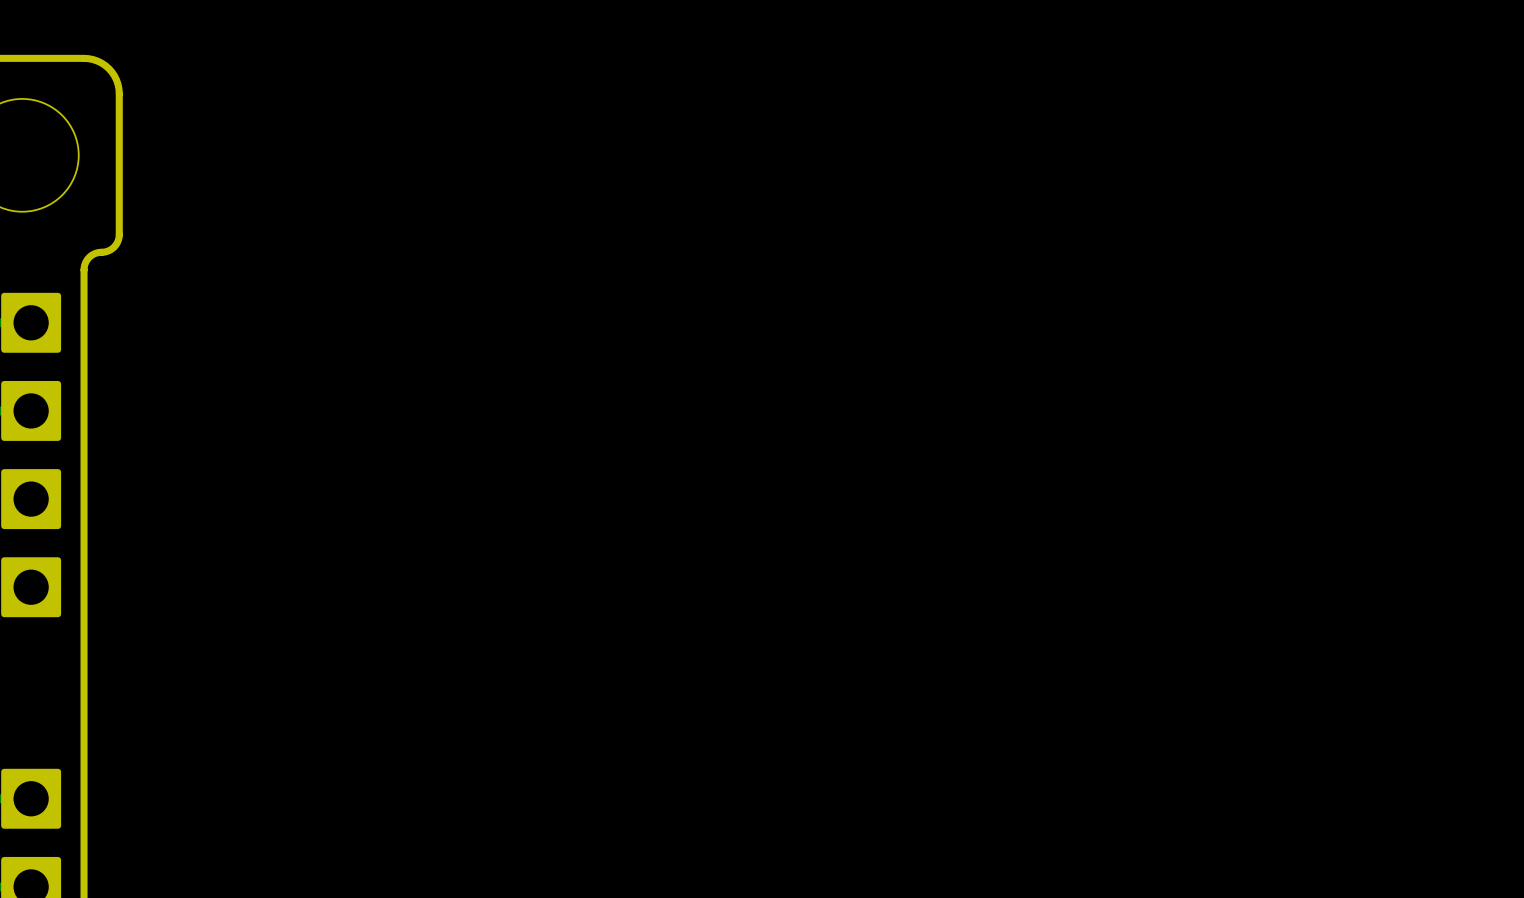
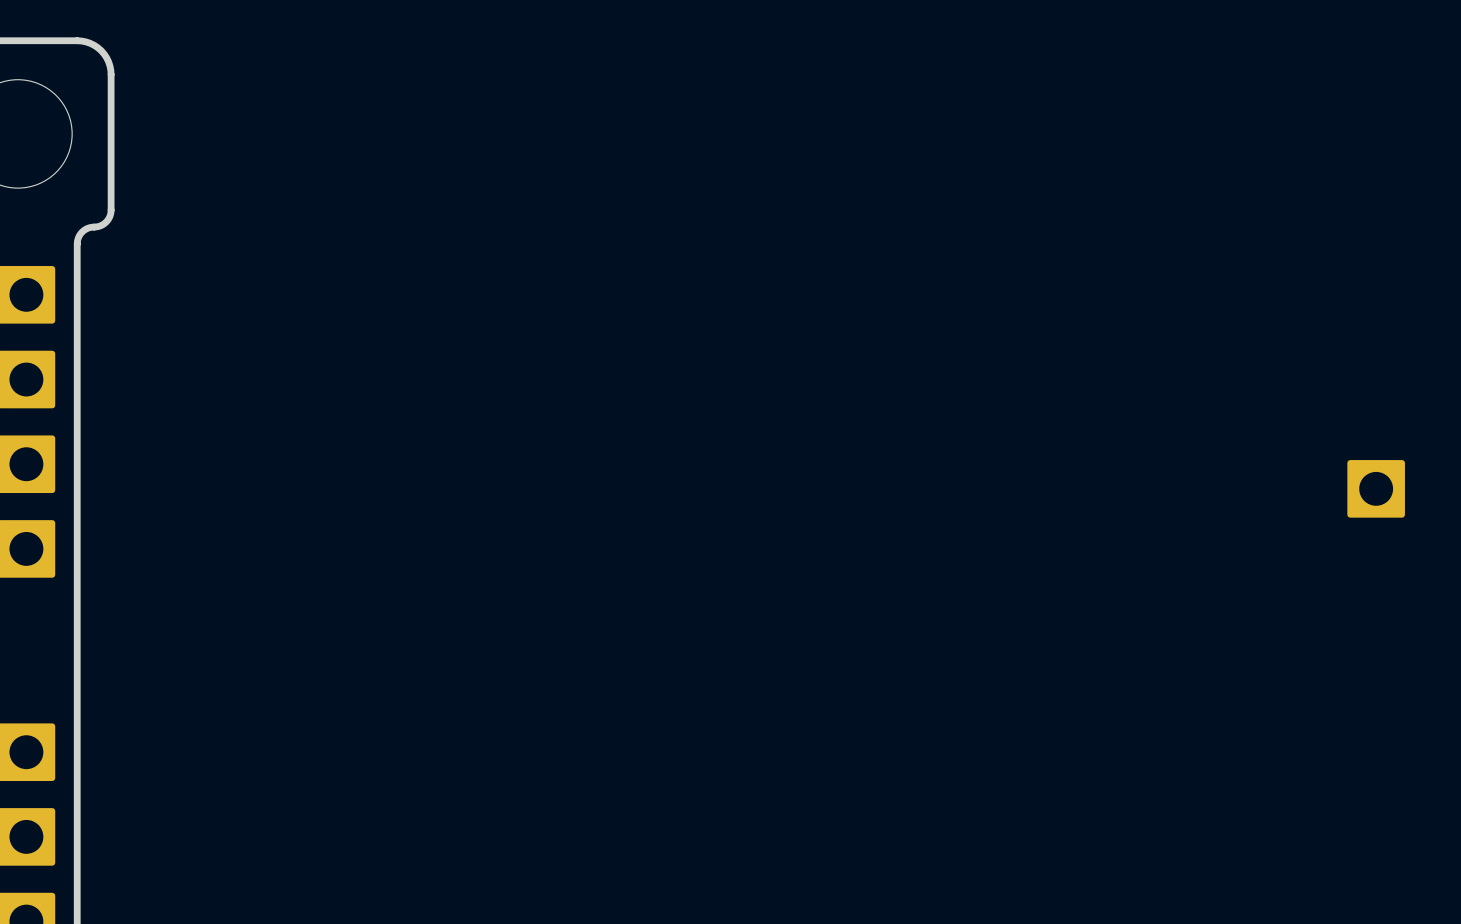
part: none -> (1376, 488)

